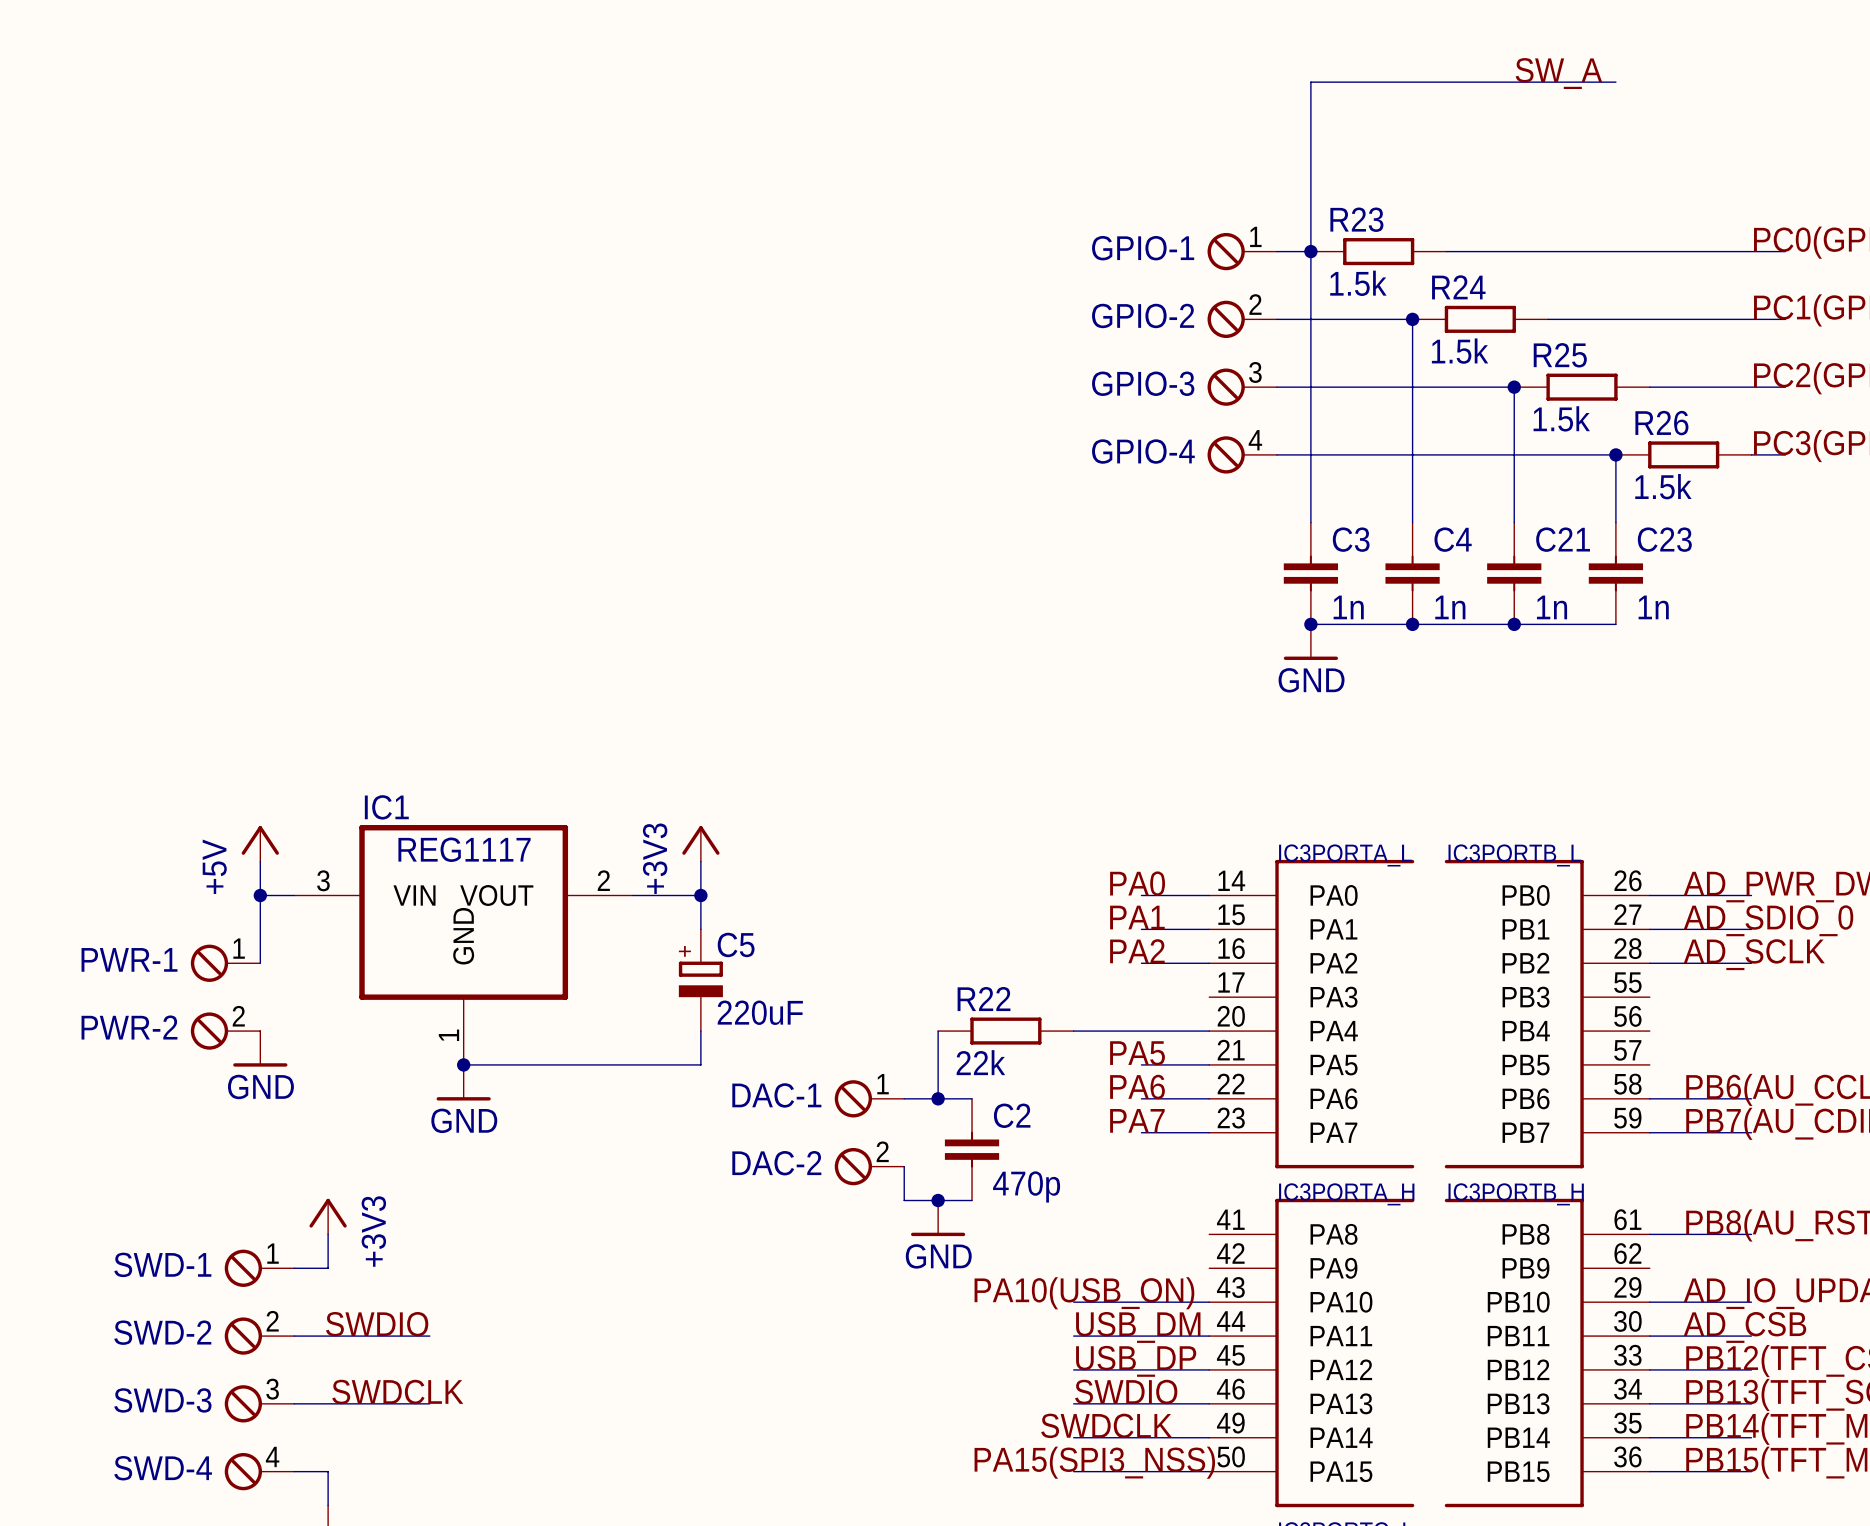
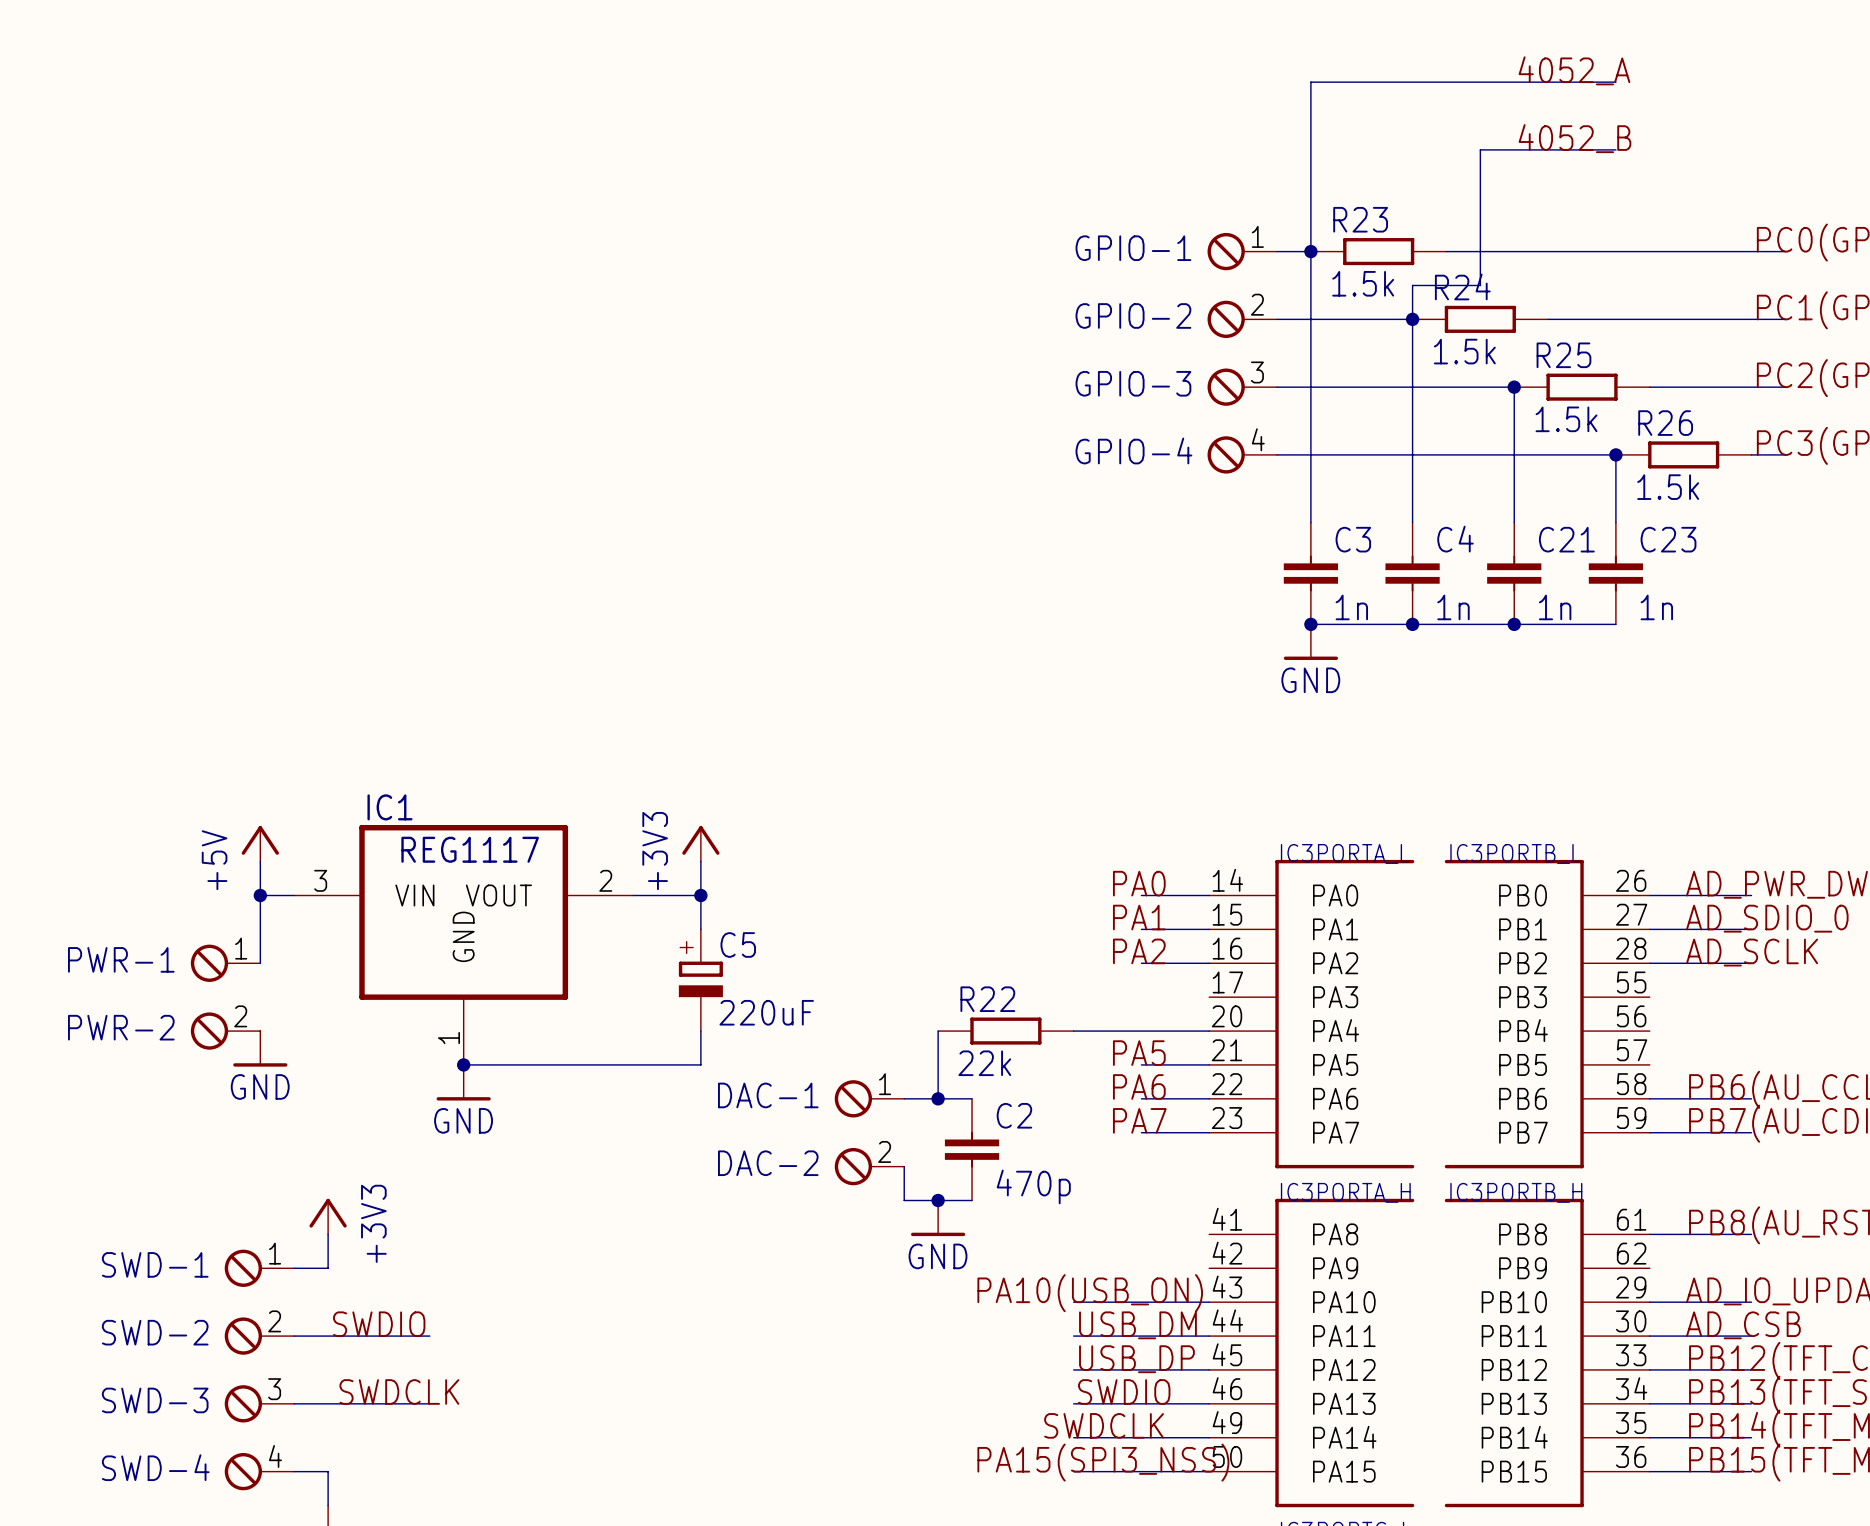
label: SW_A (1558, 73) -> 4052_A (1574, 70)
label: none -> 4052_B (1574, 138)
wire: none -> (1615, 149) (1480, 149) (1480, 285) (1412, 285) (1412, 319)

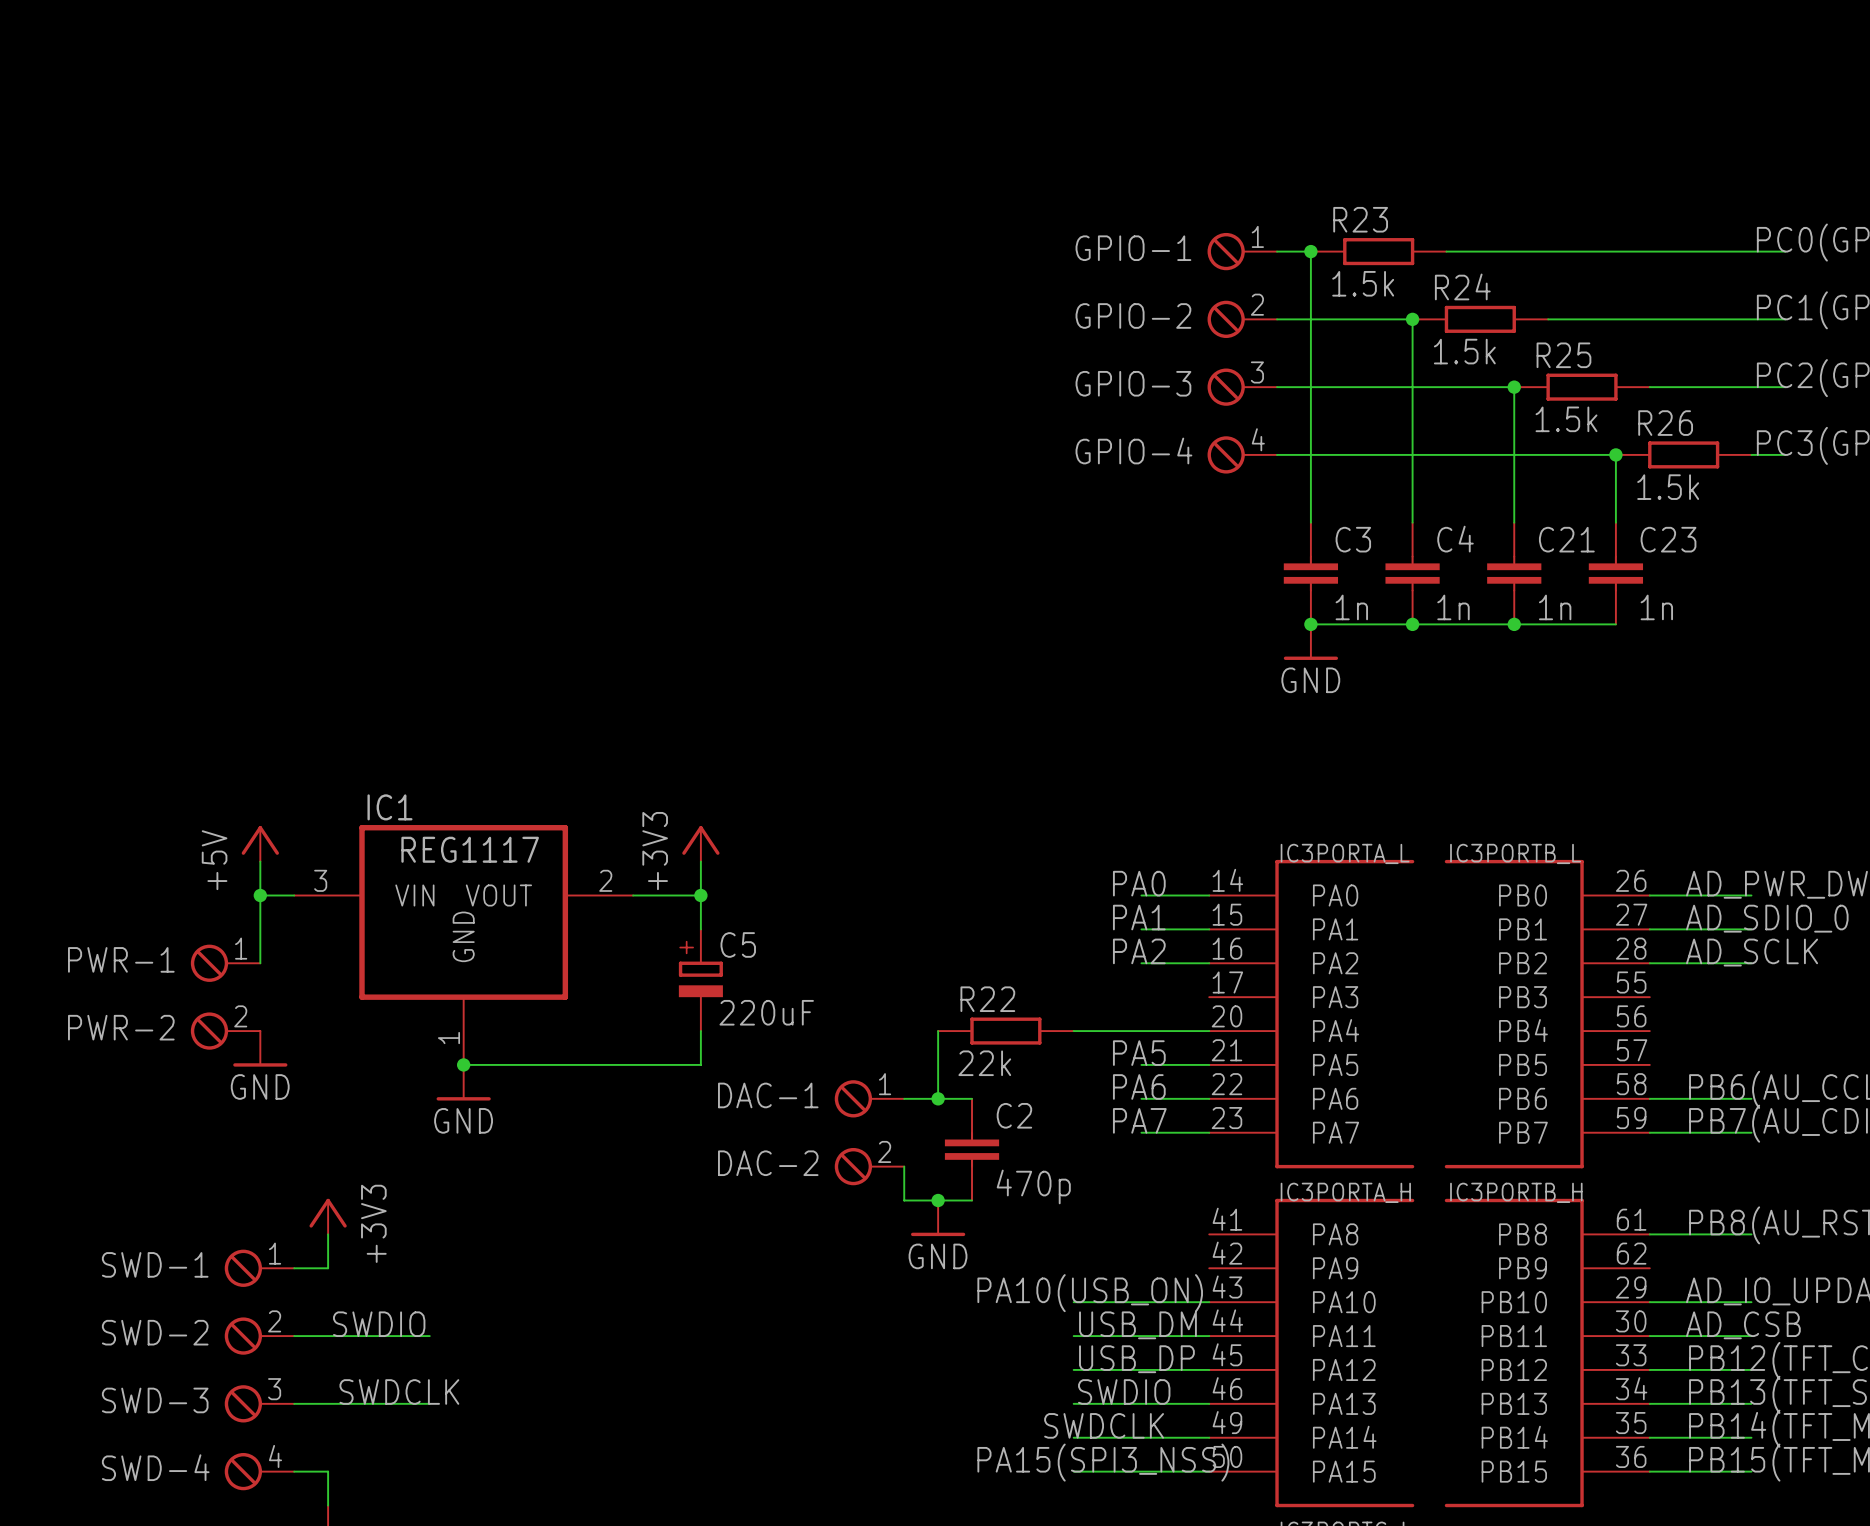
label: 4052_A (1574, 70) -> none
wire: (1615, 82) (1310, 82) (1310, 251) -> none
label: 4052_B (1574, 138) -> none
wire: (1615, 149) (1480, 149) (1480, 285) (1412, 285) (1412, 319) -> none

